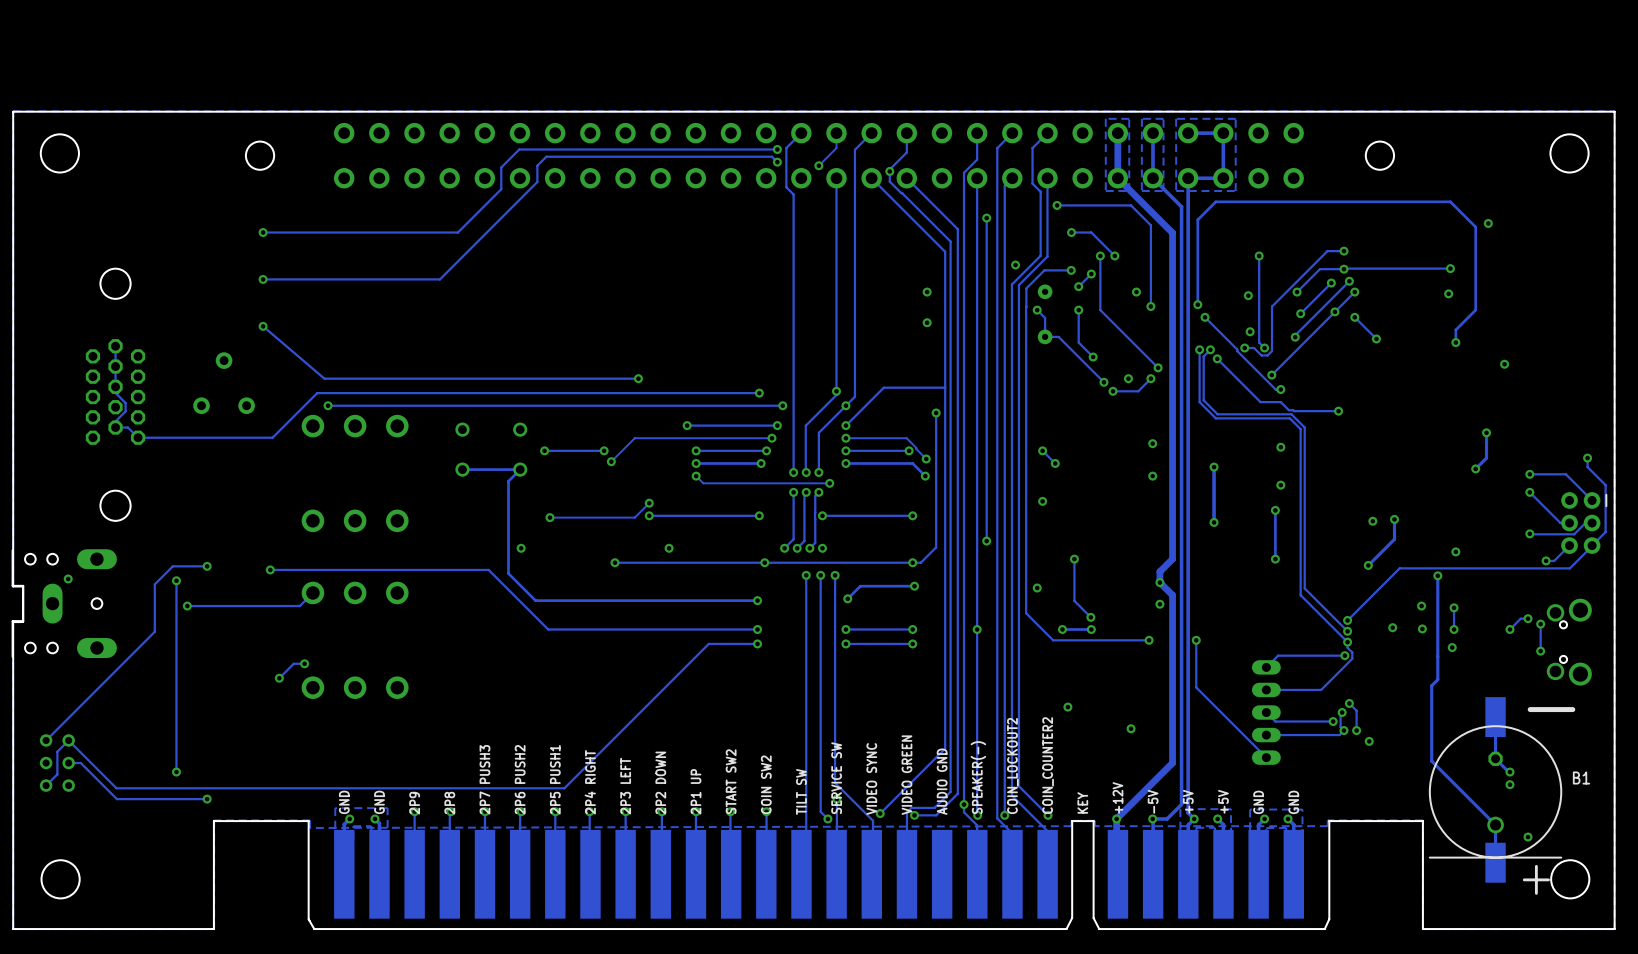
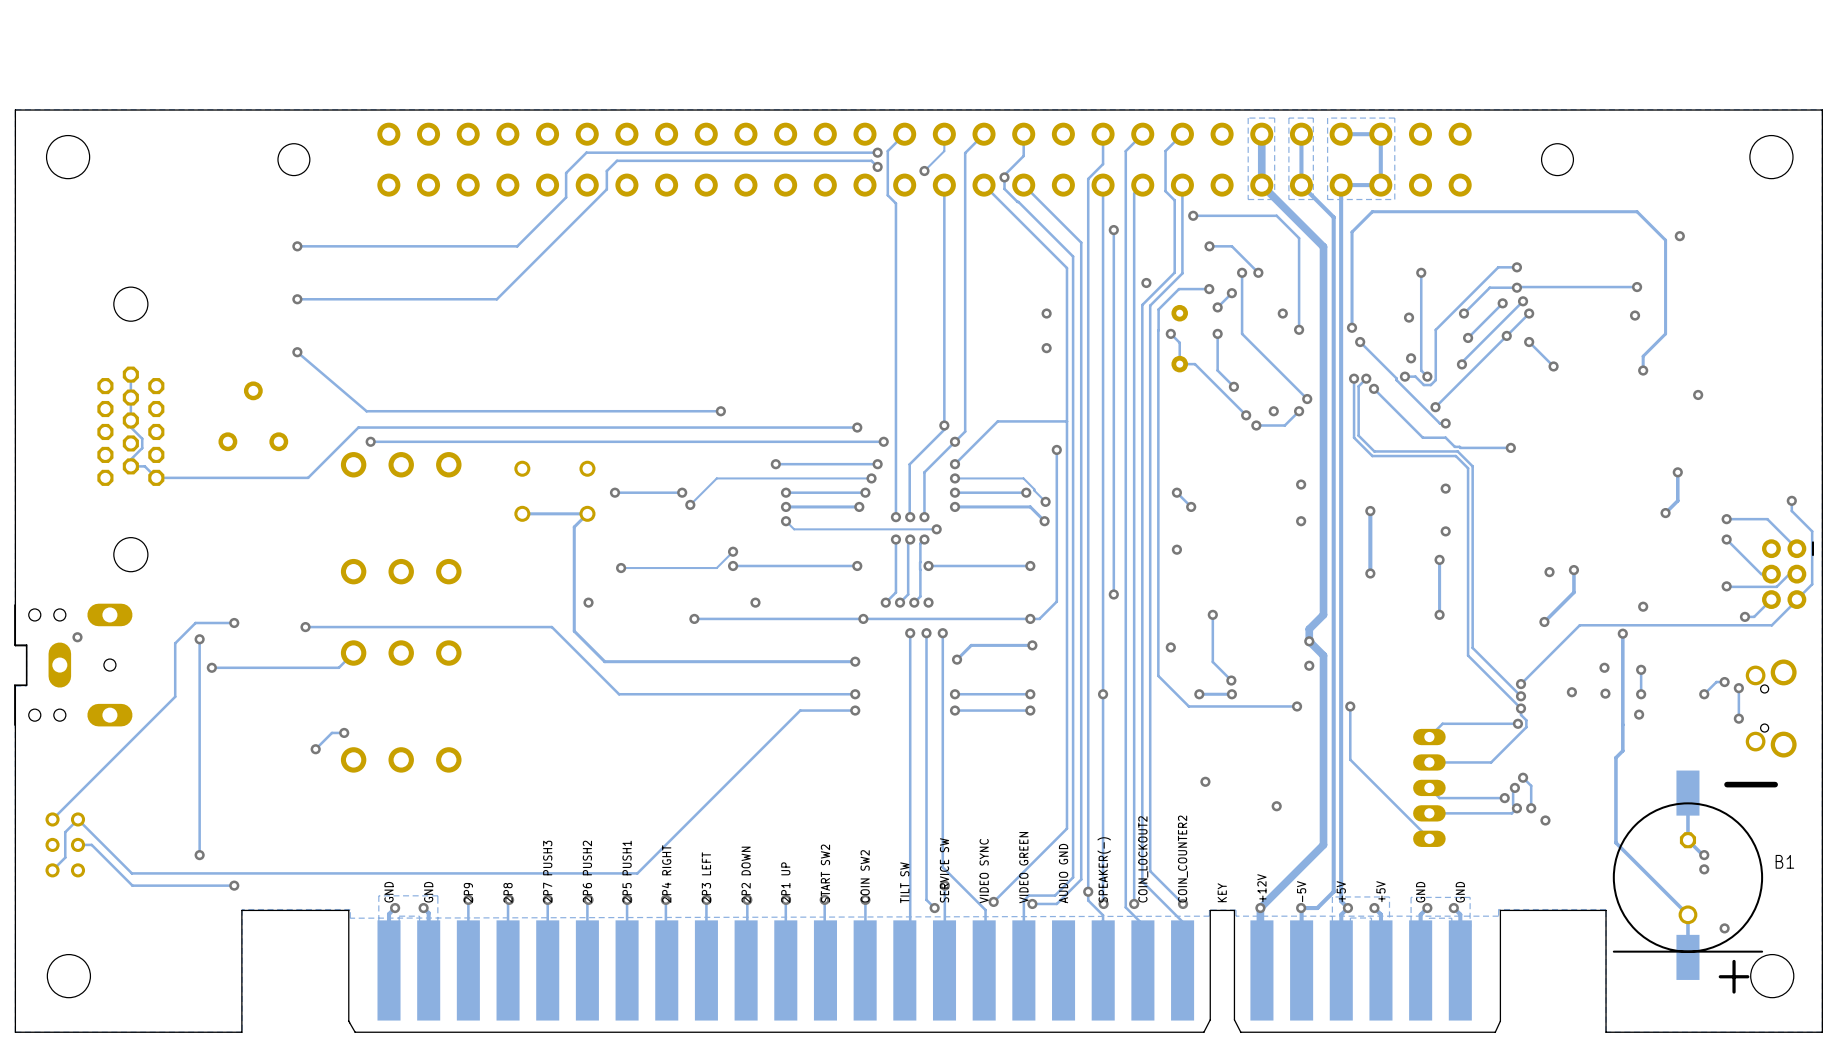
part footprint: [334, 829, 1305, 919] -> [377, 920, 1472, 1021]

